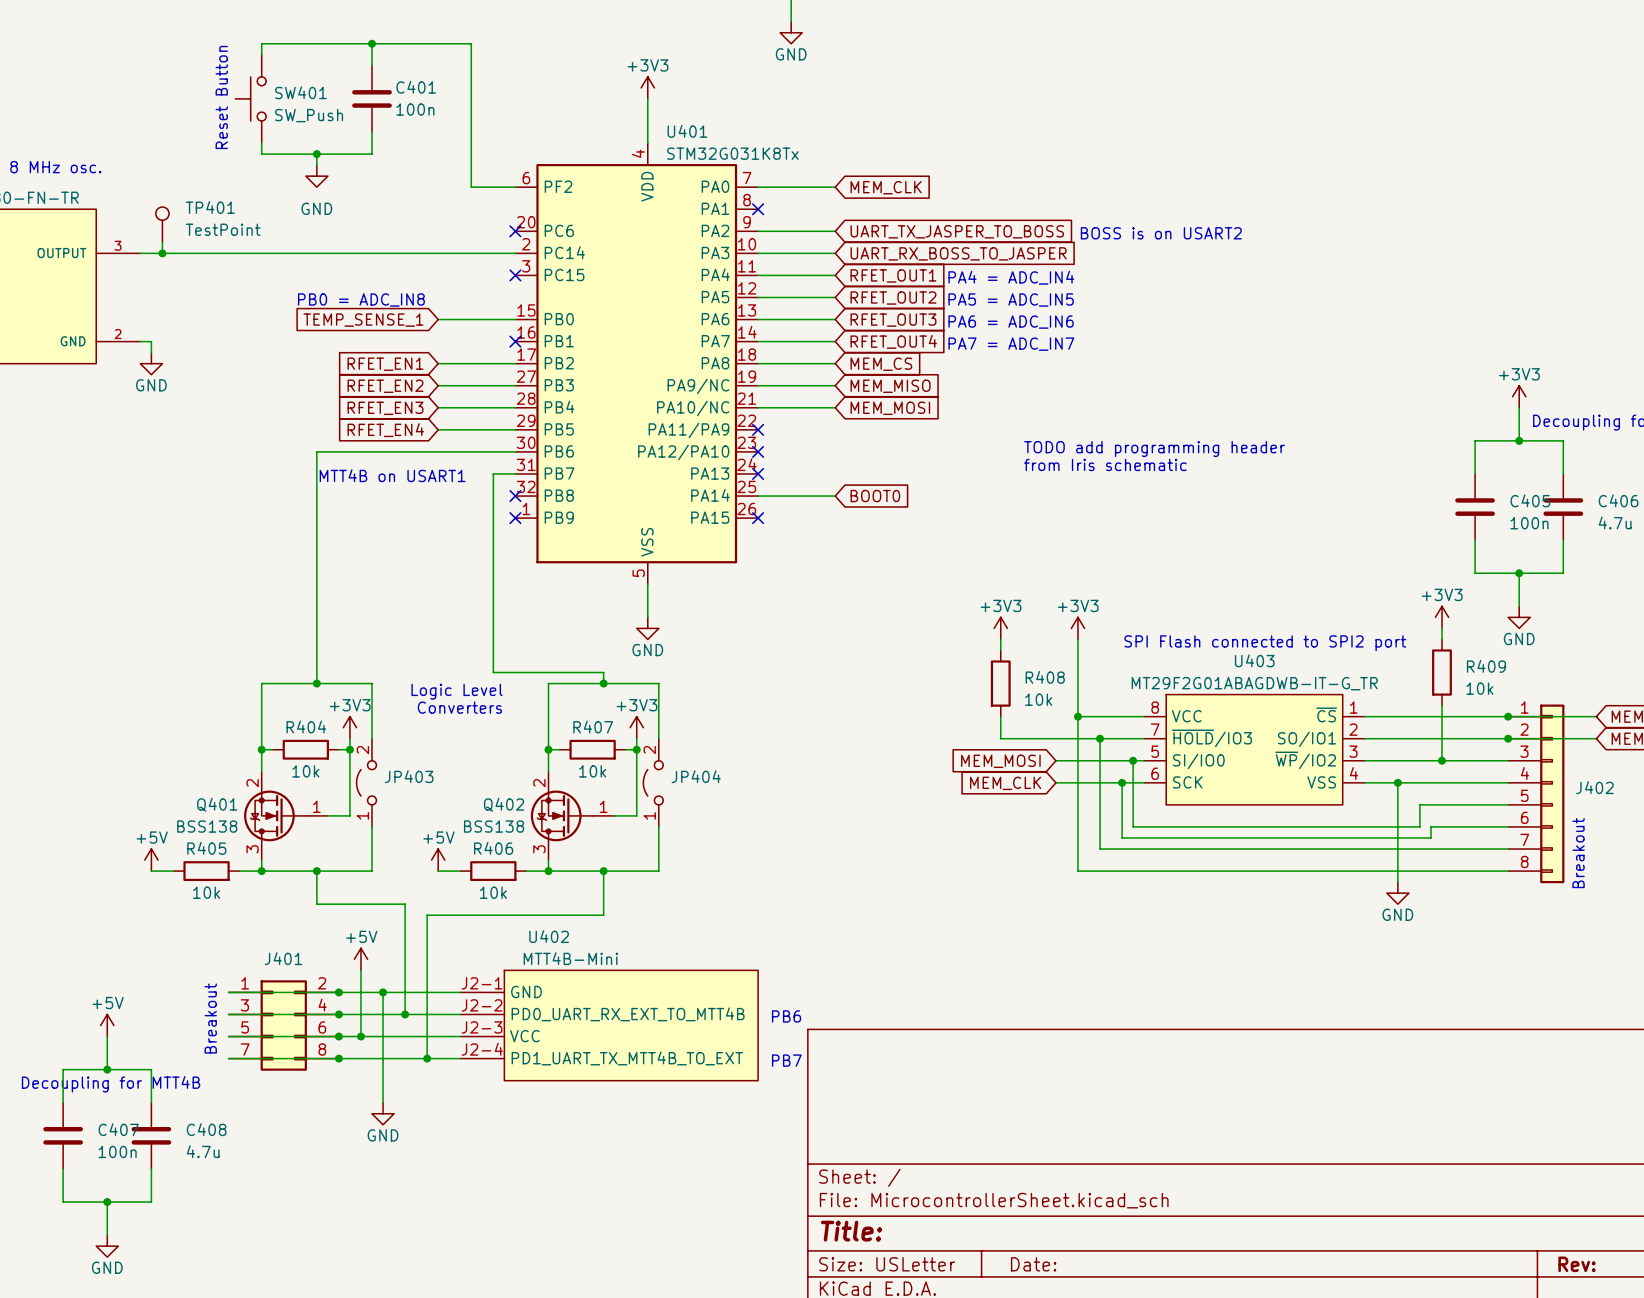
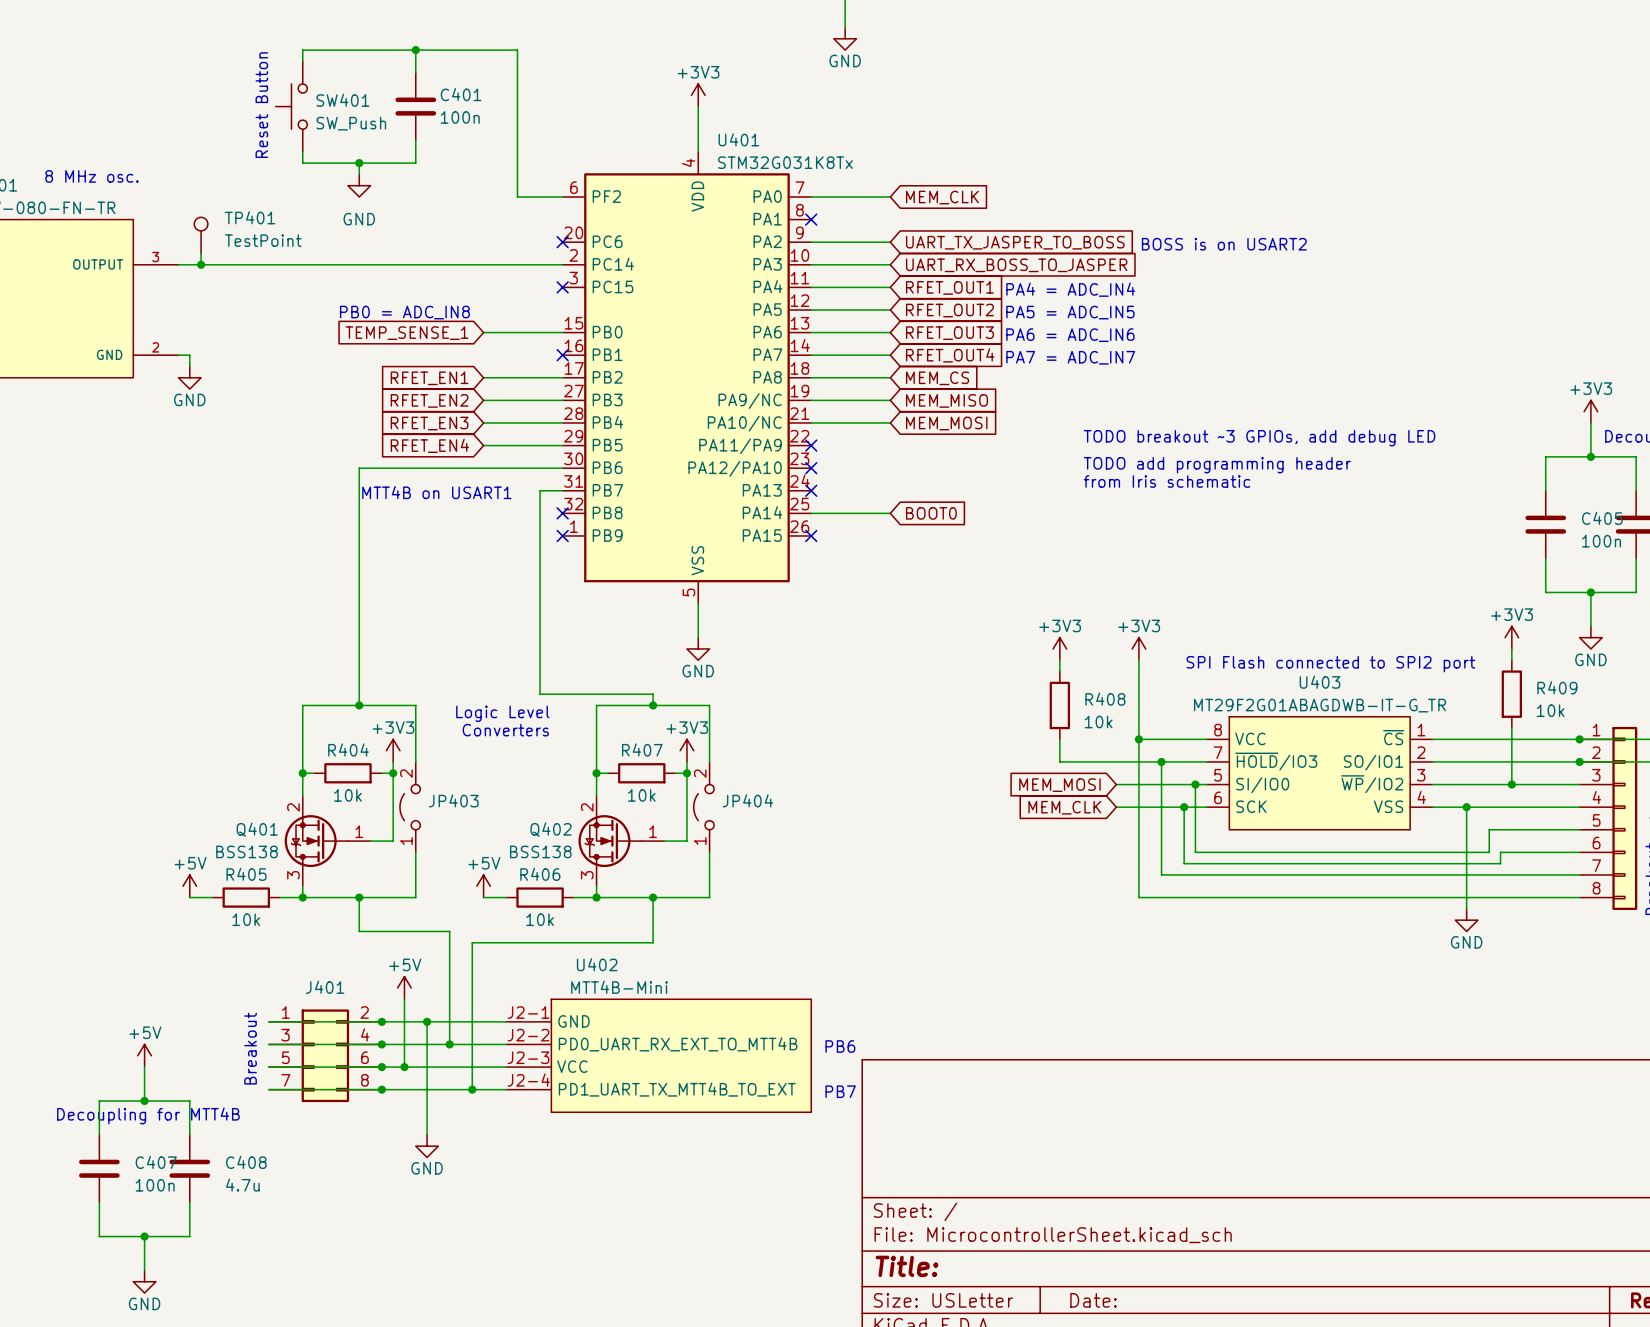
text: none -> TODO breakout ~3 GPIOs, add debug LED (1259, 438)

